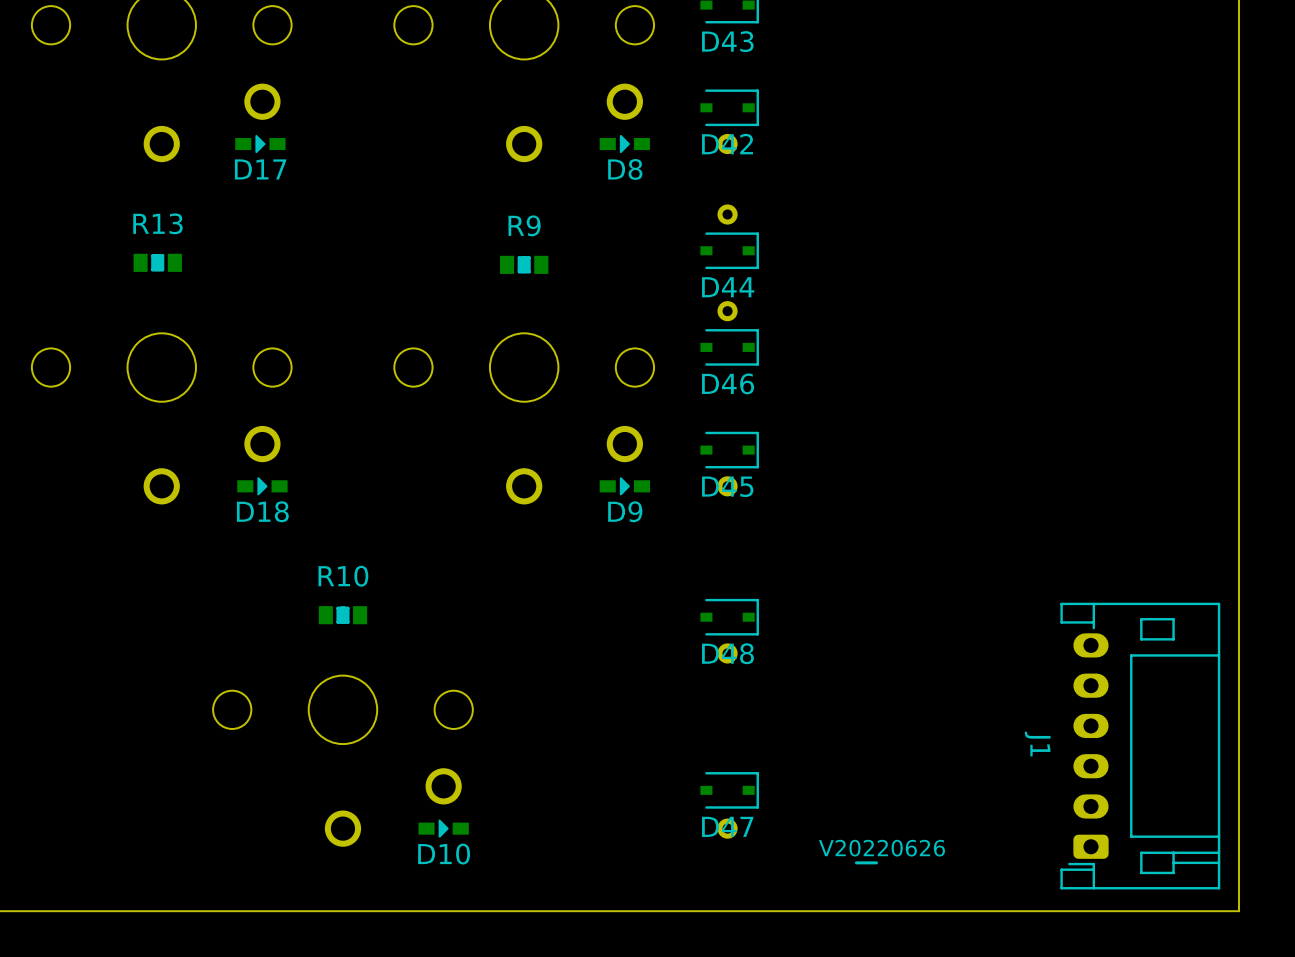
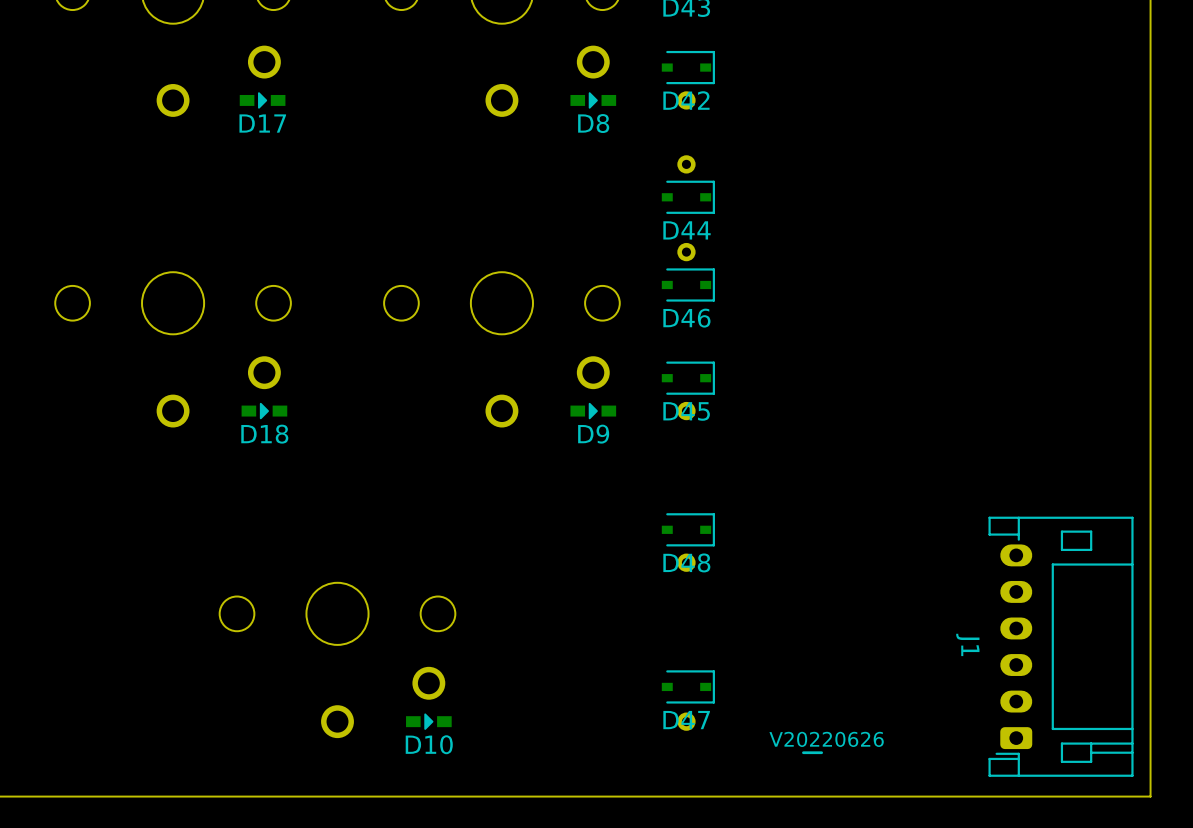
R13: (157, 262) -> none
R9: (524, 264) -> none
R10: (342, 615) -> none

